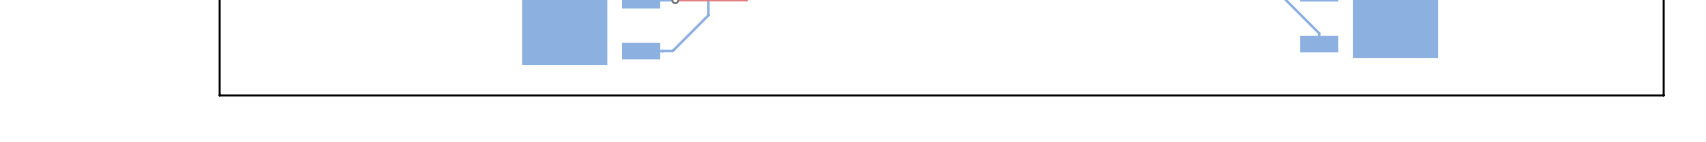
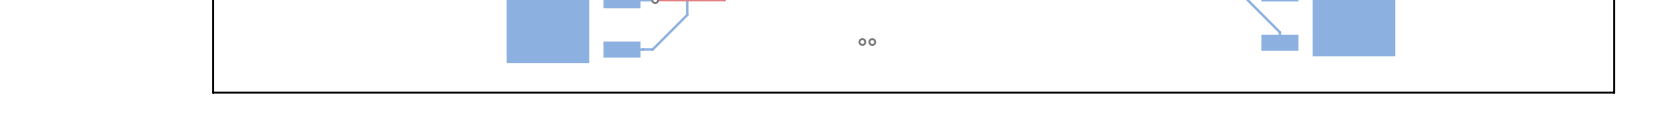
via: none -> (862, 42)
via: none -> (872, 42)

